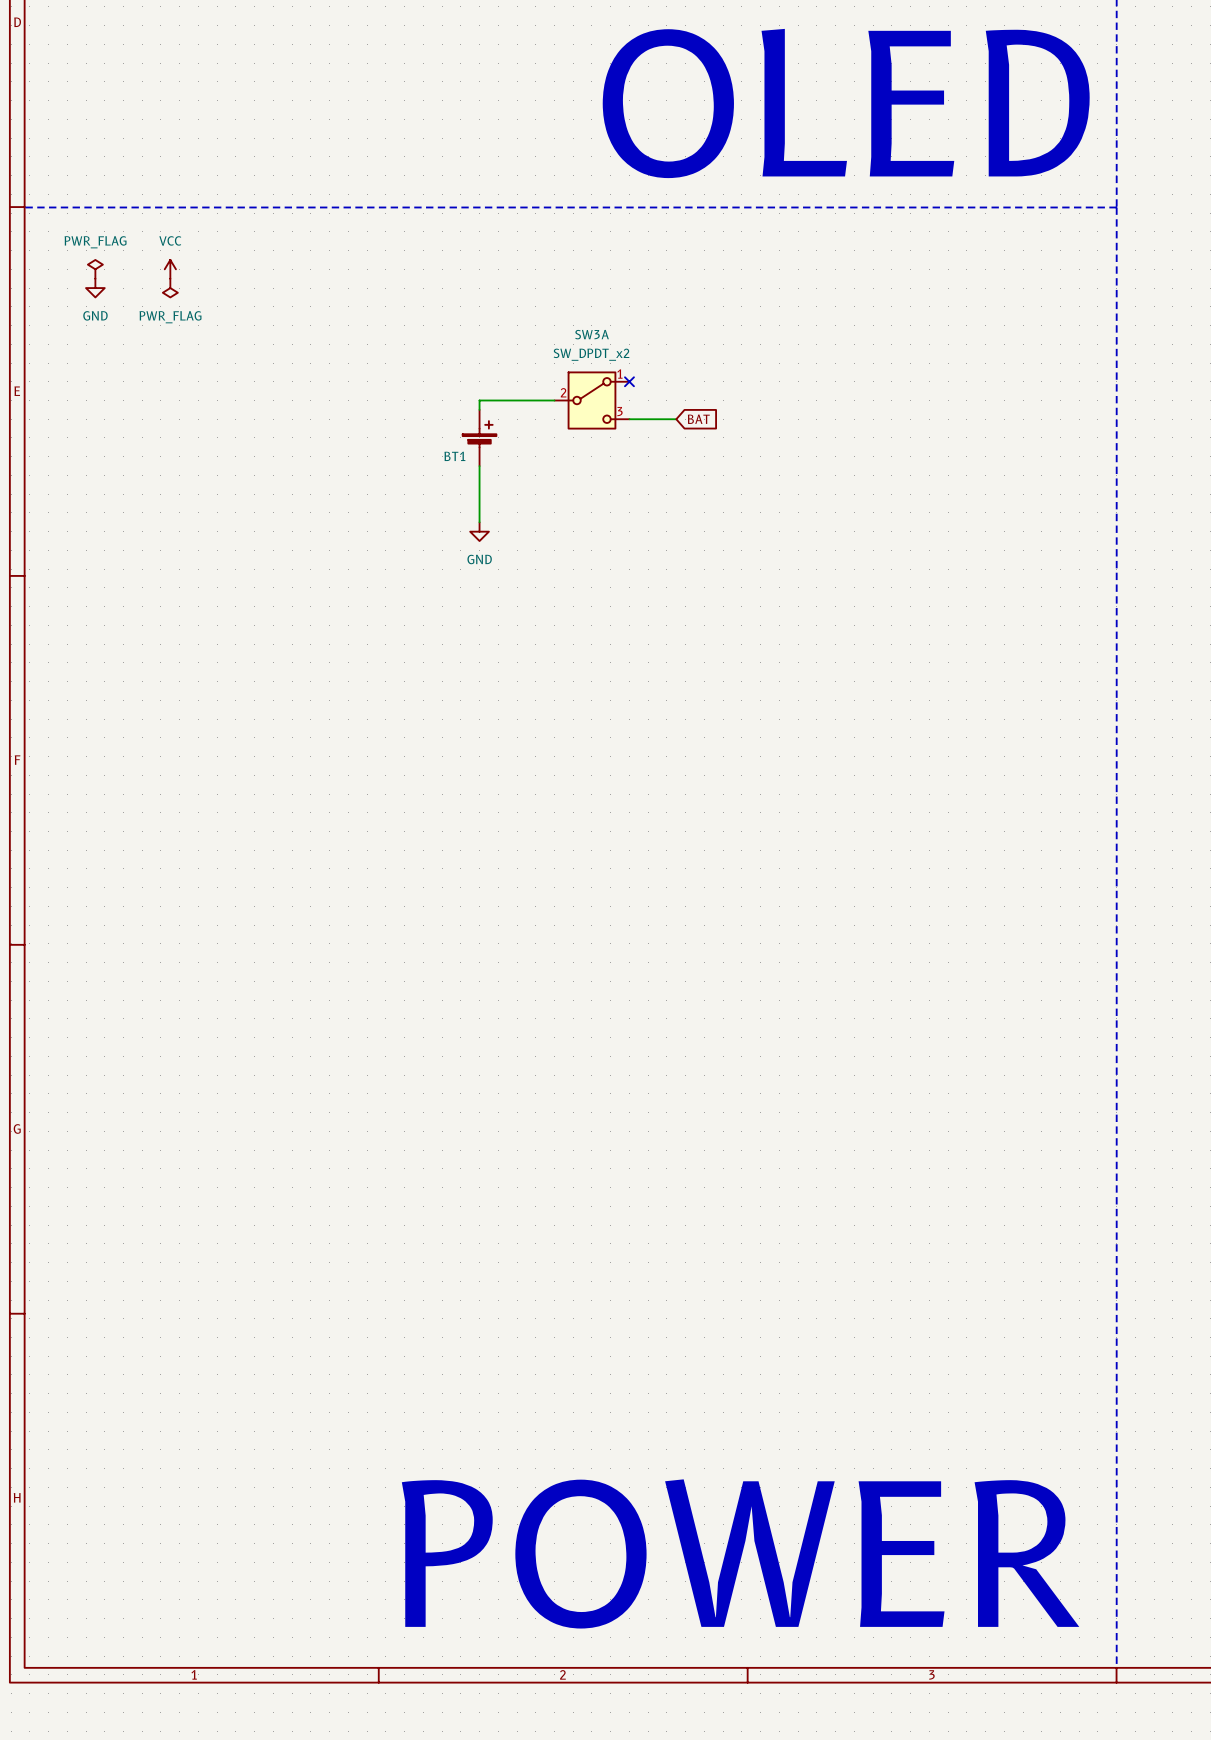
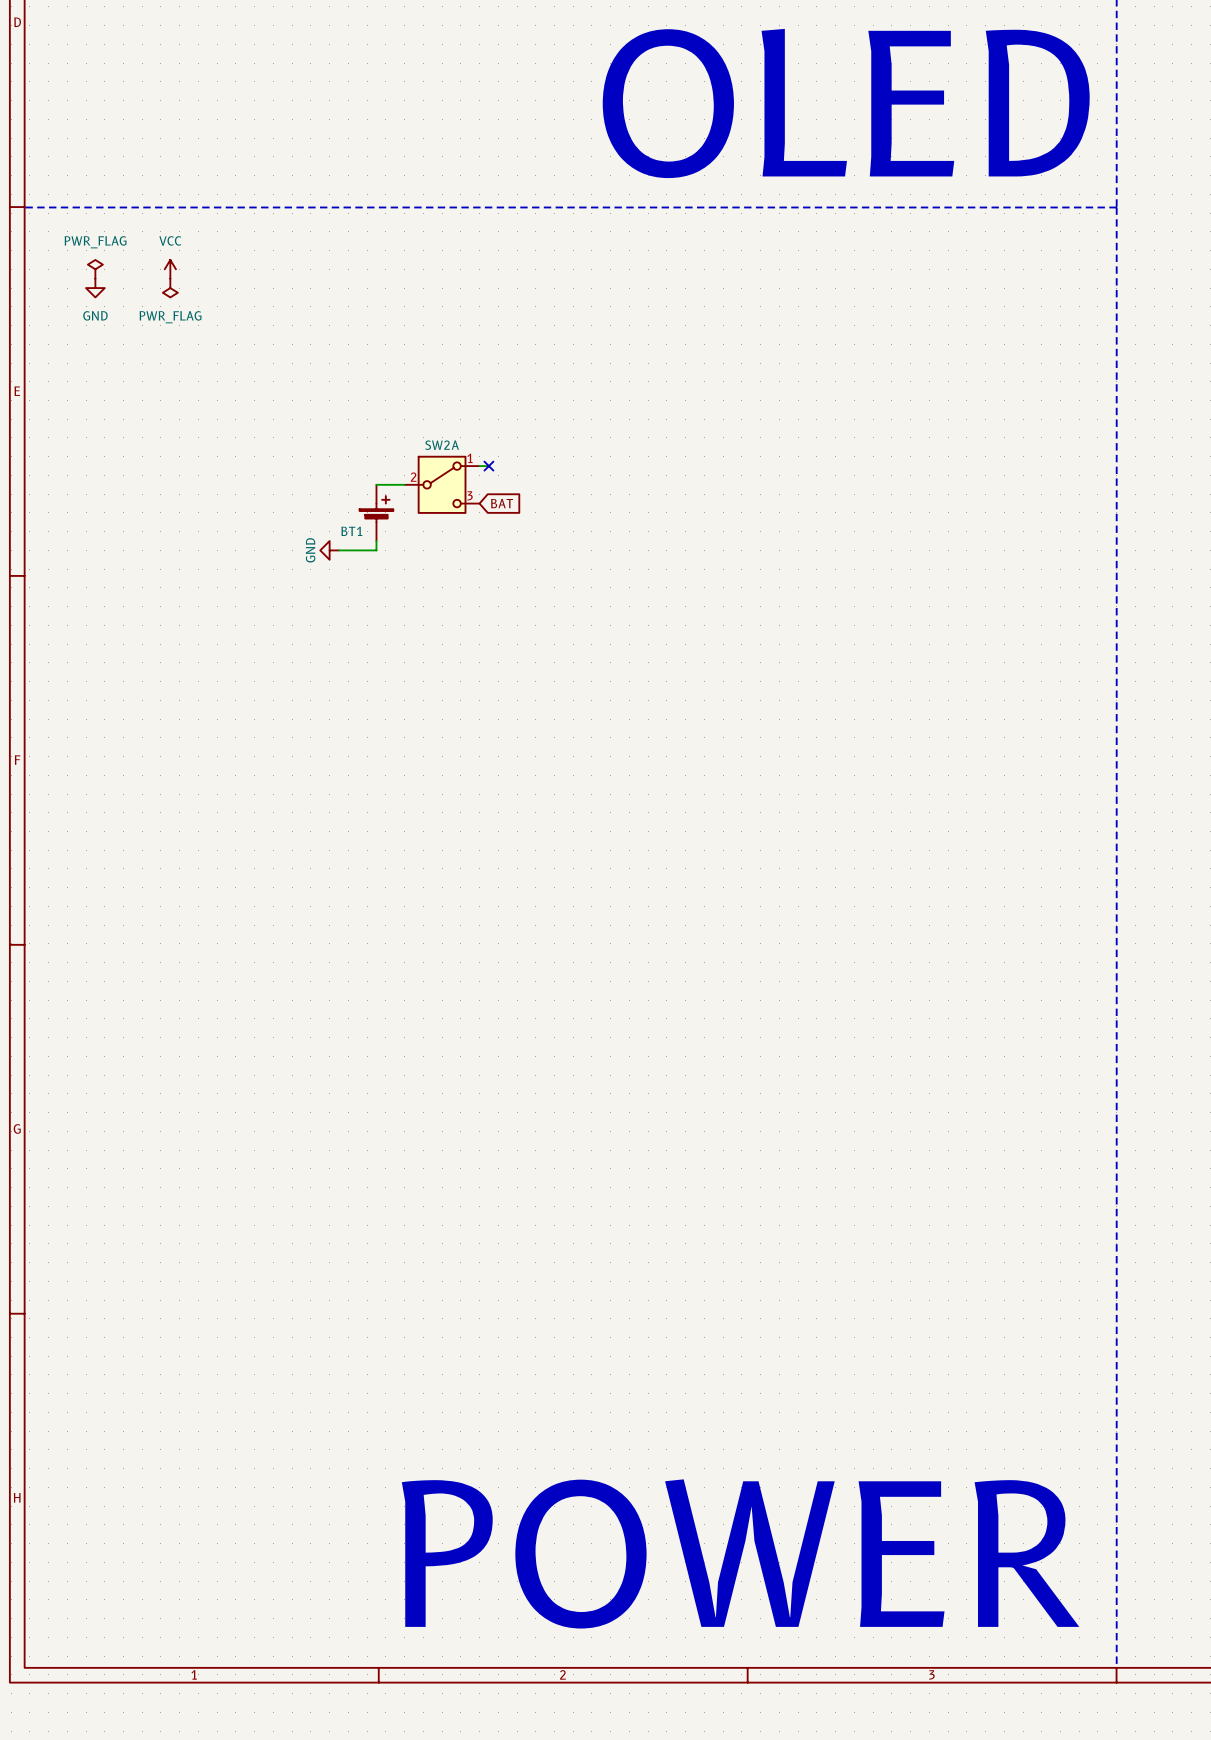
no-connect mark: (629, 381) -> none
wire: (554, 400) (479, 400) (479, 409) -> none
SW3A: SW_DPDT_x2 (591, 400) -> none
wire: (629, 419) (676, 419) -> none
global label: BAT (698, 419) -> none
BT1 position: (479, 437) -> (376, 512)
wire: (479, 466) (479, 522) -> (479, 466) (488, 466)
no-connect mark: none -> (488, 466)
wire: none -> (376, 484) (404, 484)
SW2A: none -> (442, 484)
global label: none -> BAT (502, 503)
power symbol rotation: 0° (479, 531) -> 90° clockwise (329, 550)
power symbol position: GND (479, 531) -> GND (329, 550)
wire: none -> (376, 541) (376, 550) (339, 550)

